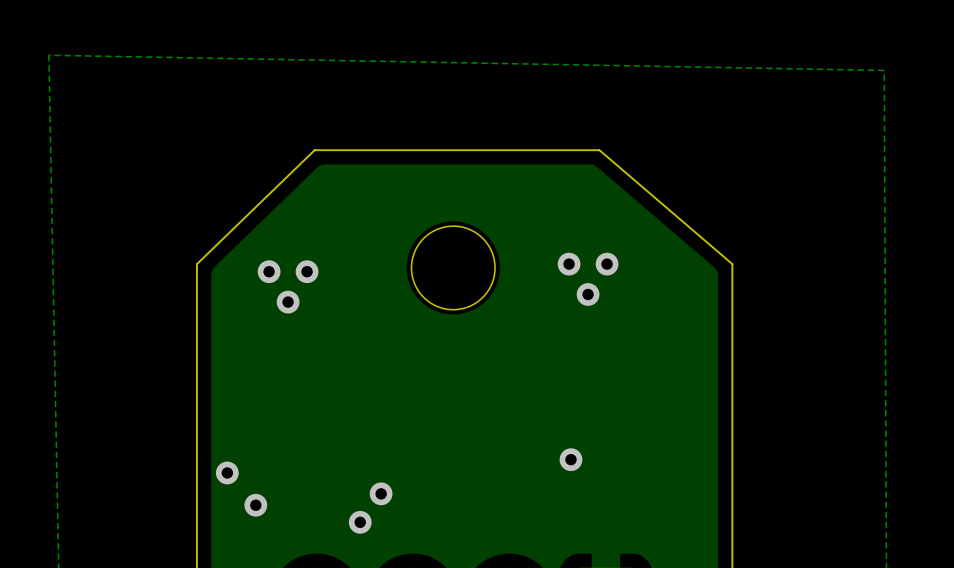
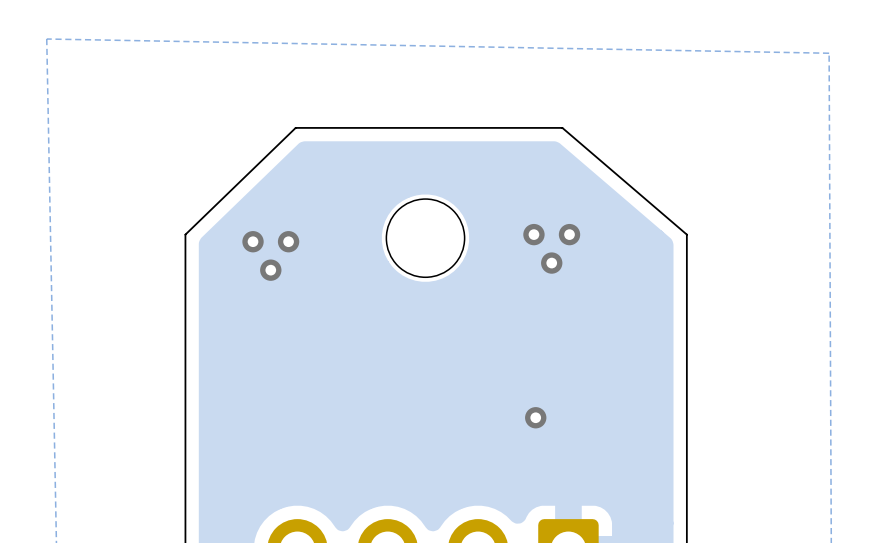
via: (227, 472) -> none
via: (381, 493) -> none
via: (255, 505) -> none
via: (360, 522) -> none

